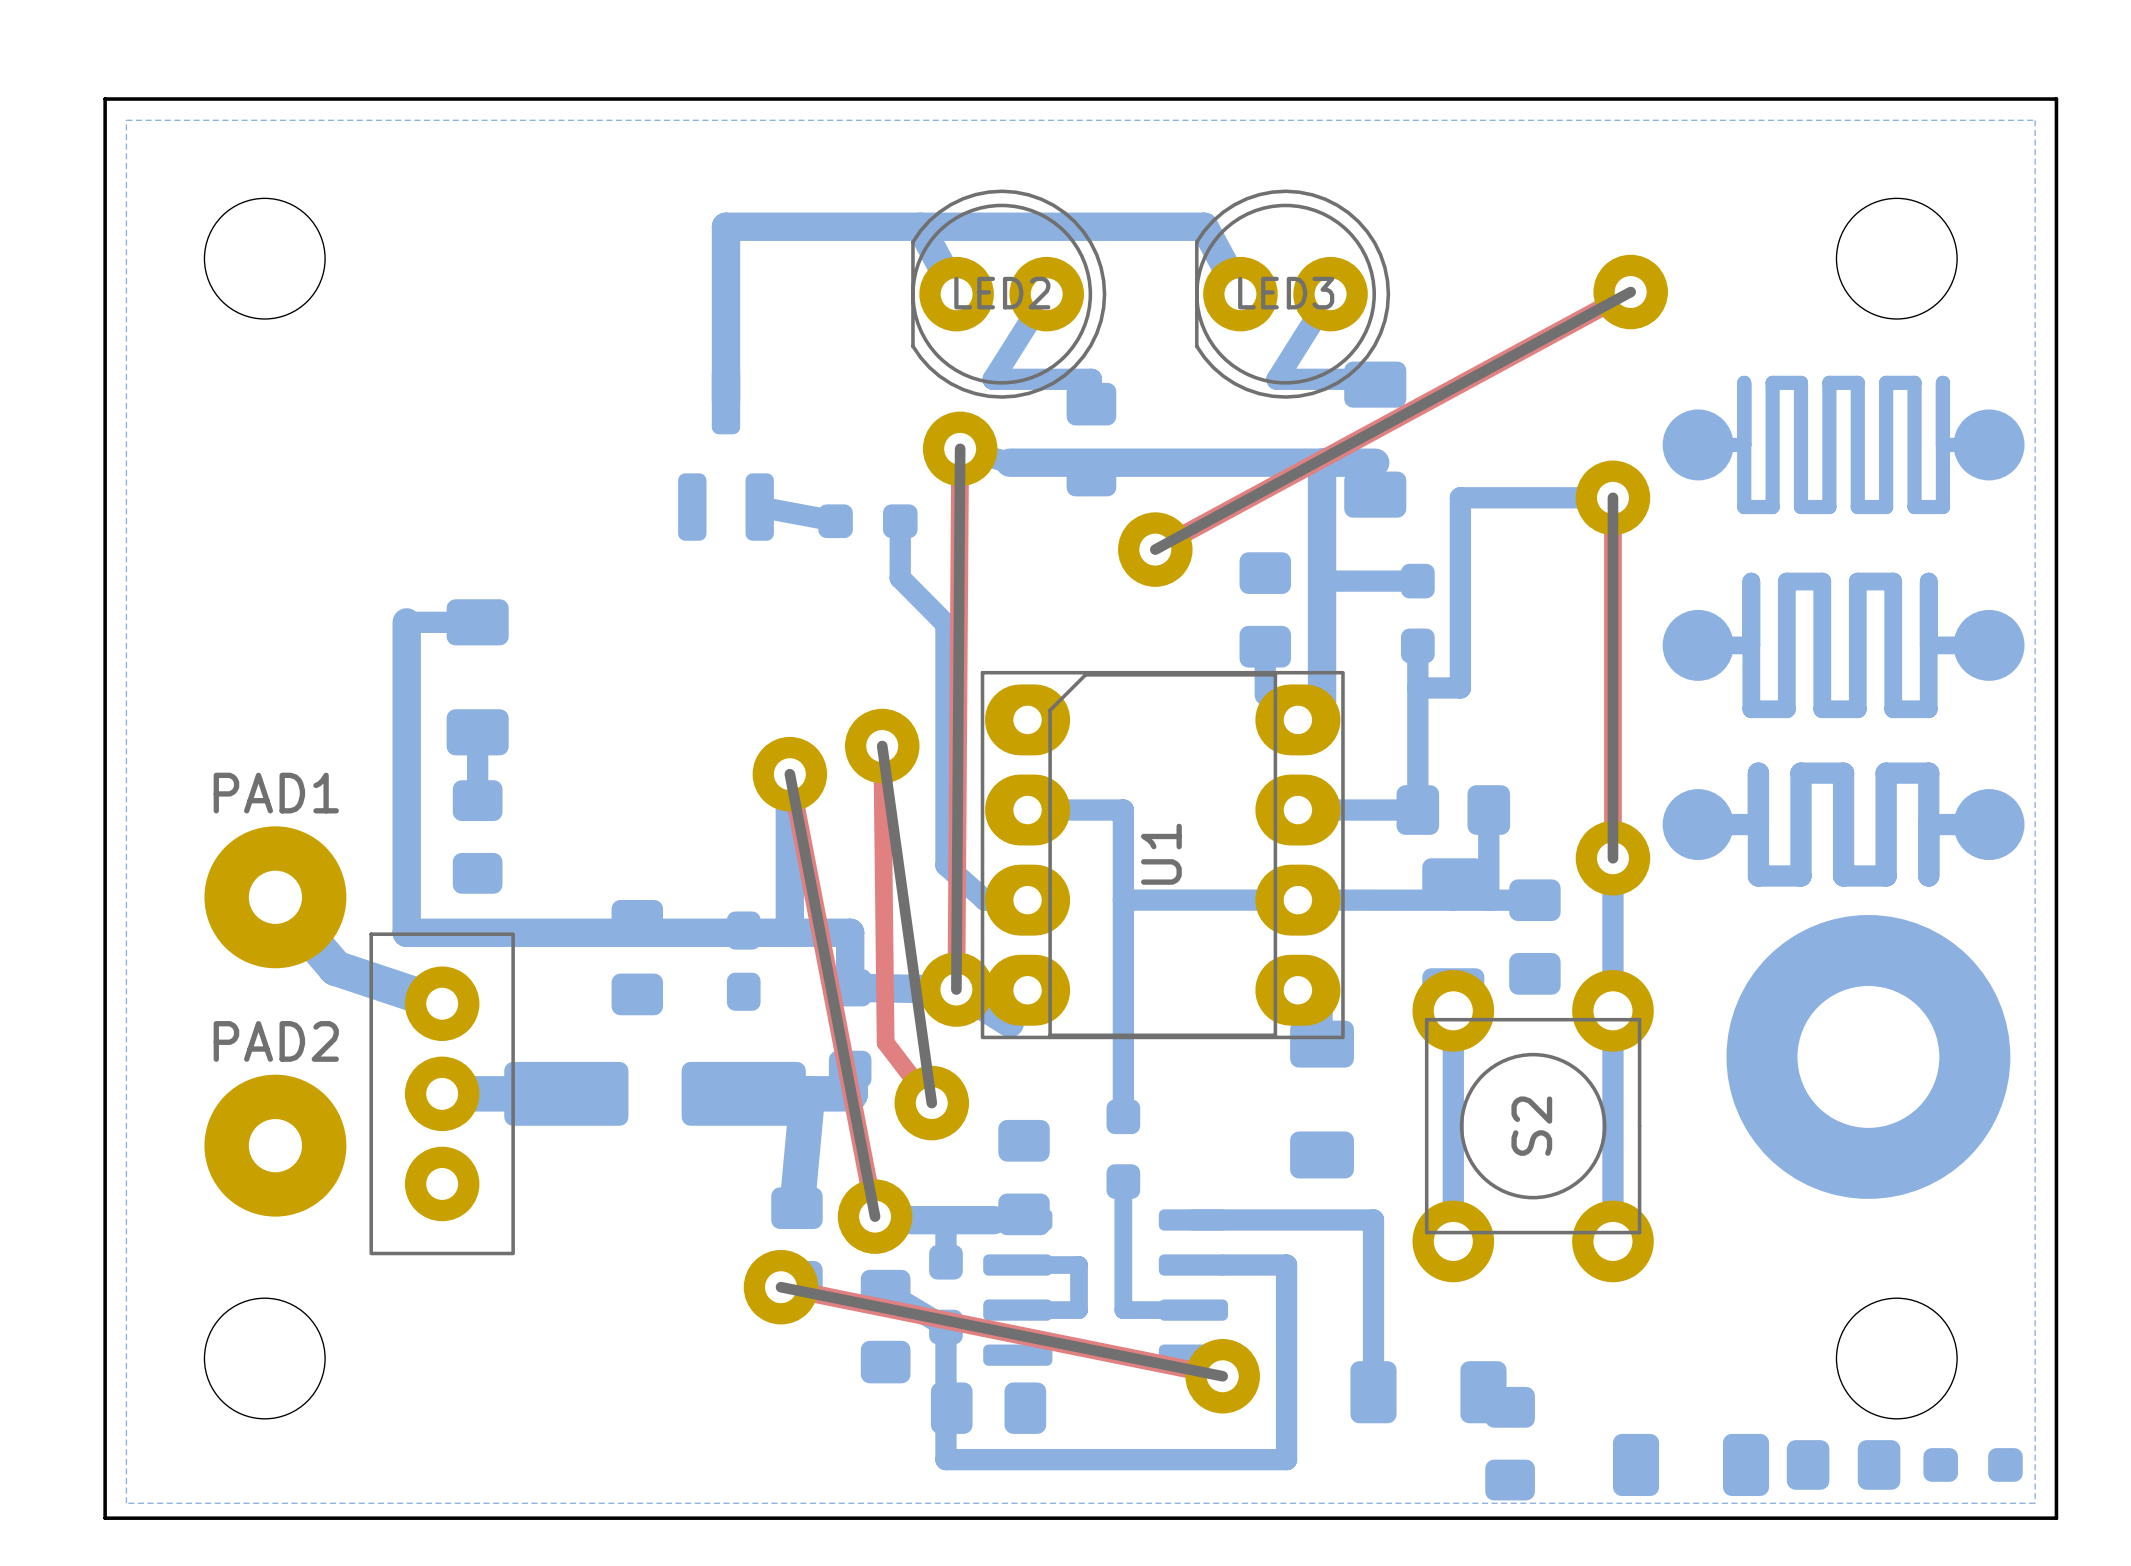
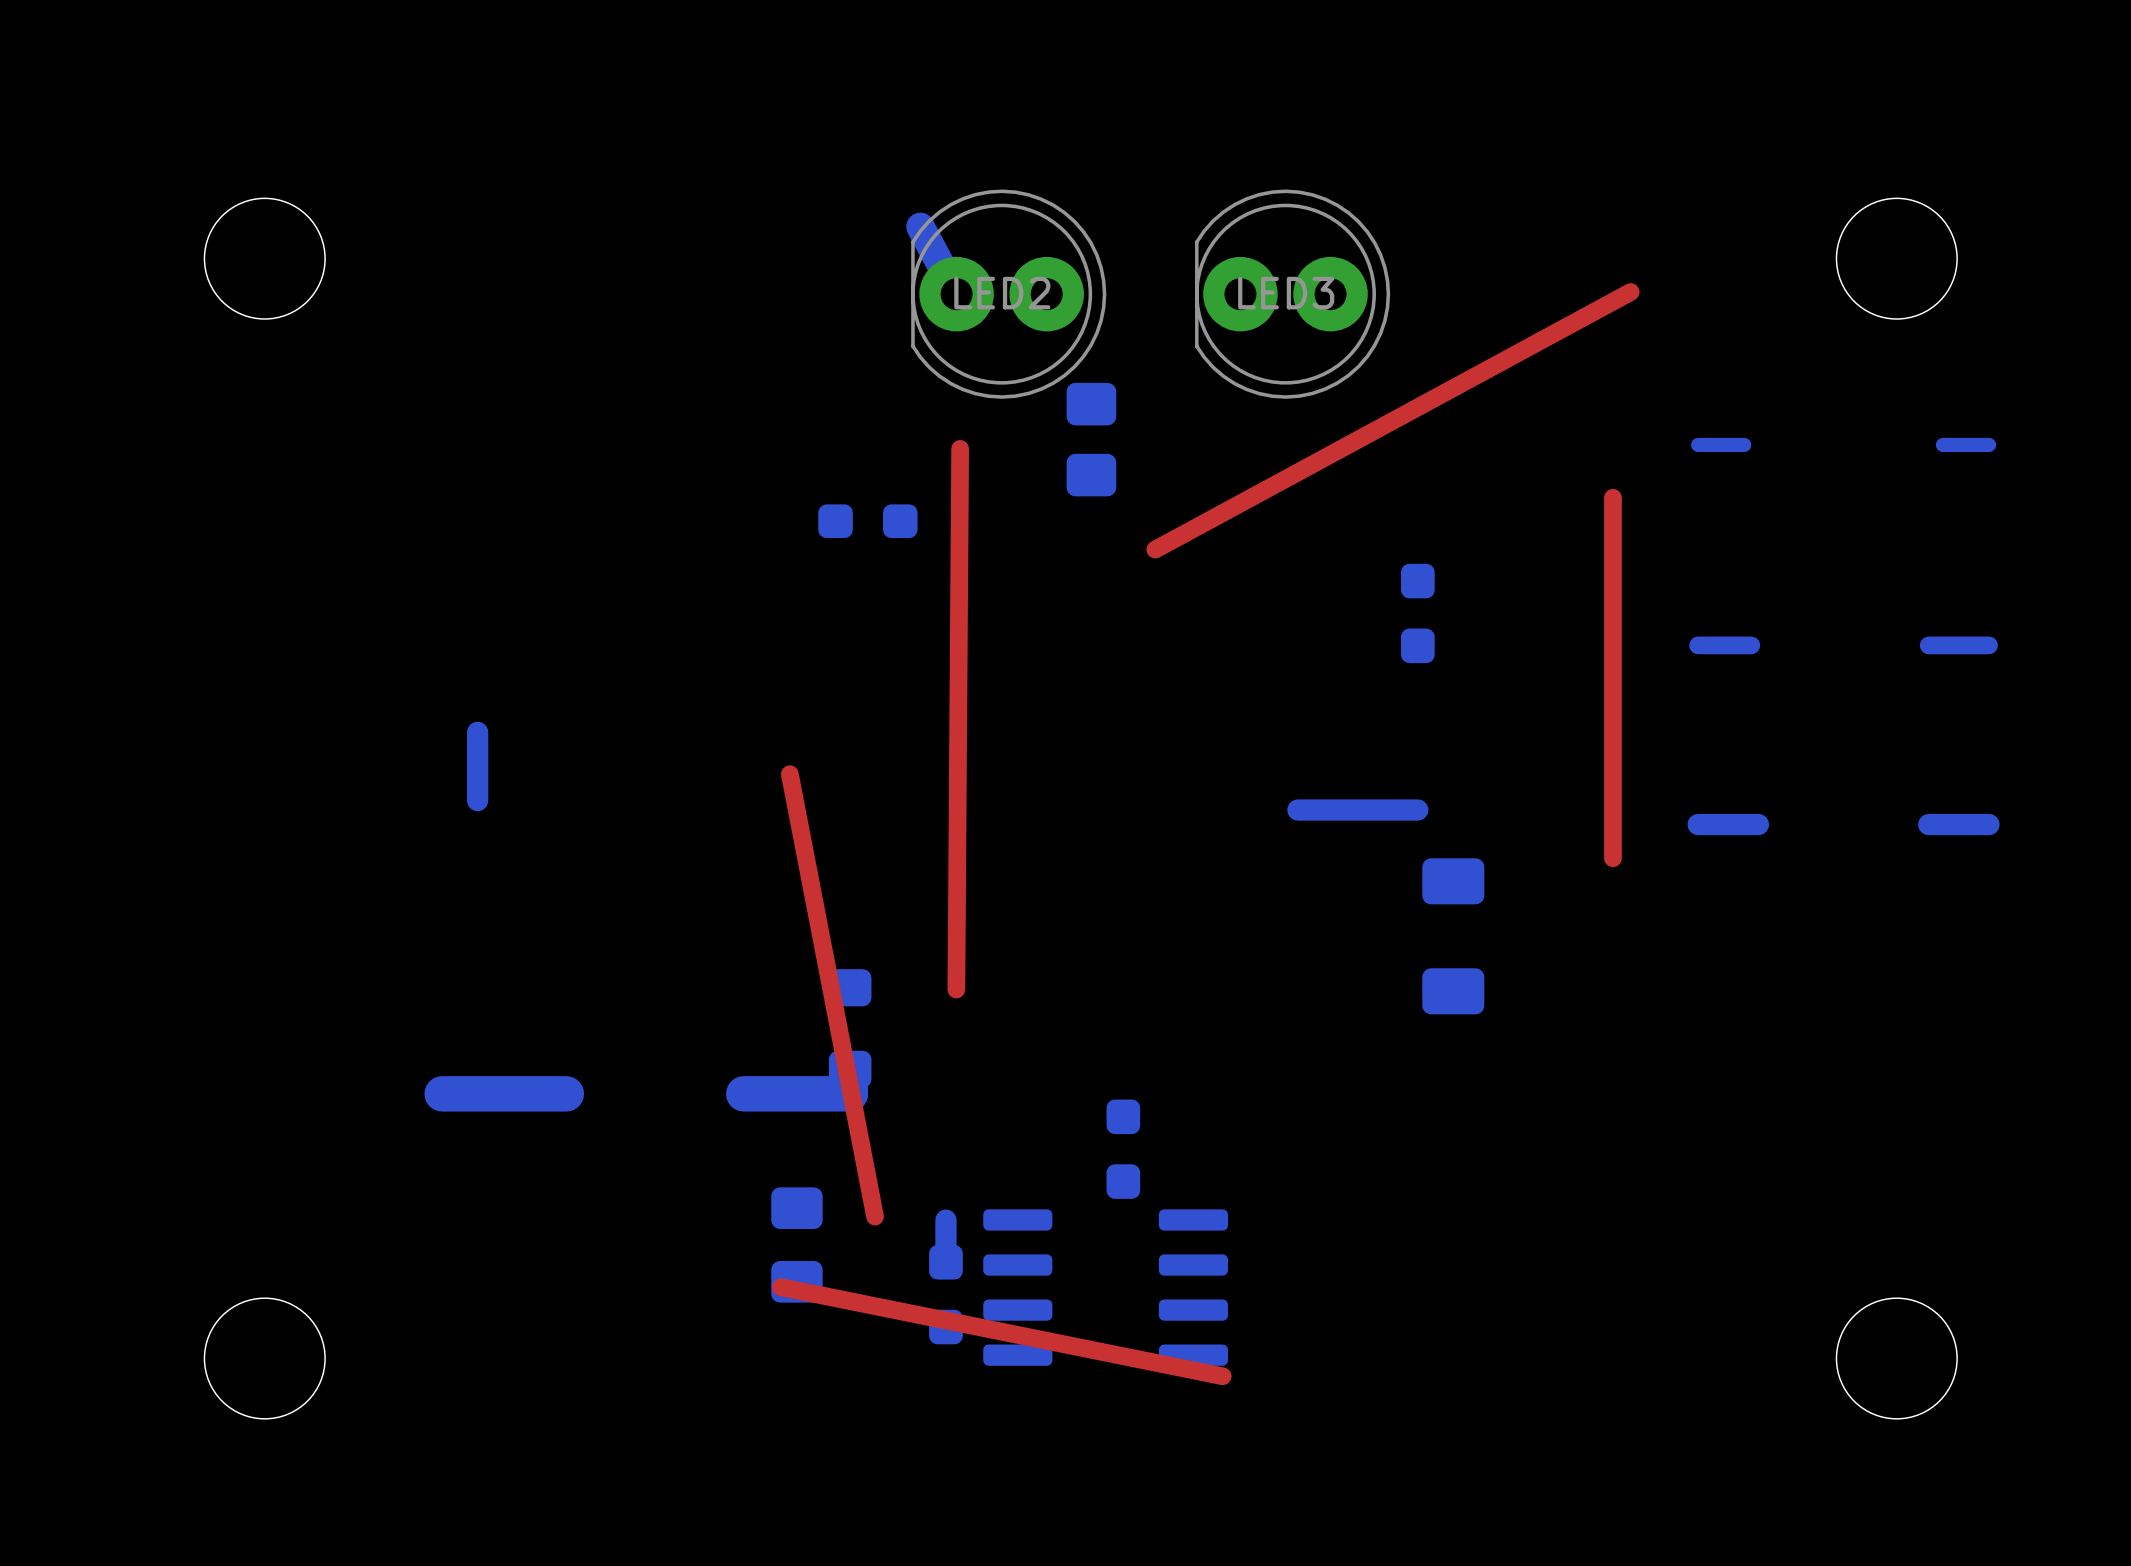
board edge: (105, 99) (2056, 99) (2056, 1518) (105, 1518) (105, 99) -> none
bottom zone outline: (126, 120) (2035, 120) (2035, 1503) (126, 1503) (126, 120) -> none
bottom track: (1046, 294) (993, 379) (1091, 379) (1091, 404) -> none
bottom track: (1240, 294) (1204, 226) (726, 226) (726, 400) -> none
bottom track: (1330, 294) (1276, 379) (1375, 379) (1375, 384) -> none
bottom track: (1744, 382) (1744, 507) (1772, 507) (1772, 382) (1801, 382) (1801, 507) (1829, 507) (1829, 382) (1857, 382) (1857, 507) (1886, 507) (1886, 382) (1914, 382) (1914, 507) (1942, 507) (1942, 382) -> none
part: (1392, 420) -> none
part: (1375, 439) -> none
part: (1698, 444) -> none
part: (1989, 444) -> none
bottom track: (960, 448) (1009, 462) (1375, 462) -> none
part: (726, 453) -> none
bottom track: (1322, 462) (1322, 702) -> none
bottom track: (1612, 497) (1460, 497) (1460, 687) (1417, 687) -> none
bottom track: (759, 507) (835, 521) -> none
bottom track: (900, 521) (900, 577) (945, 624) (945, 865) (984, 900) (1027, 900) -> none
bottom track: (1322, 581) (1417, 581) -> none
bottom track: (1751, 581) (1751, 709) (1786, 709) (1786, 581) (1822, 581) (1822, 709) (1857, 709) (1857, 581) (1893, 581) (1893, 709) (1928, 709) (1928, 581) -> none
part: (1265, 609) -> none
bottom track: (477, 622) (406, 622) (406, 932) (850, 932) (850, 987) (956, 989) (1009, 1023) -> none
bottom track: (1417, 645) (1417, 790) -> none
part: (1698, 645) -> none
part: (1989, 645) -> none
bottom track: (1265, 646) (1265, 695) -> none
part: (477, 677) -> none
part: (1612, 678) -> none
part: (958, 719) -> none
top track: (882, 746) (885, 1042) (931, 1103) -> none
bottom track: (1758, 773) (1758, 876) (1801, 876) (1801, 773) (1843, 773) (1843, 876) (1886, 876) (1886, 773) (1928, 773) (1928, 876) -> none
bottom track: (789, 774) (789, 932) -> none
bottom track: (1027, 810) (1123, 810) (1123, 1116) -> none
part: (1453, 810) -> none
bottom track: (1488, 810) (1488, 900) -> none
part: (1698, 824) -> none
part: (1989, 824) -> none
part: (477, 836) -> none
U1: (1162, 855) -> none
bottom track: (1612, 858) (1612, 971) -> none
bottom track: (275, 897) (335, 968) (442, 1003) -> none
PAD1: (275, 897) -> none
bottom track: (1123, 900) (1261, 900) -> none
bottom track: (1297, 900) (1534, 900) -> none
drawing: [1726, 915, 2011, 1199] -> none
part: (907, 924) -> none
part: (1534, 937) -> none
part: (637, 957) -> none
part: (743, 961) -> none
part: (832, 995) -> none
bottom track: (1322, 1007) (1322, 1044) -> none
bottom track: (1453, 1010) (1453, 1241) -> none
bottom track: (1612, 1010) (1612, 1241) -> none
part: (442, 1093) -> none
part: (655, 1093) -> none
bottom track: (807, 1093) (796, 1208) -> none
part: (1322, 1099) -> none
S2: (1533, 1126) -> none
PAD2: (275, 1145) -> none
part: (1024, 1177) -> none
bottom track: (1123, 1181) (1123, 1310) (1160, 1310) -> none
bottom track: (1193, 1219) (1373, 1219) (1373, 1376) -> none
bottom track: (910, 1220) (993, 1220) -> none
bottom track: (1017, 1265) (1079, 1265) (1079, 1310) (1017, 1310) -> none
bottom track: (1222, 1265) (1286, 1265) (1286, 1459) (945, 1459) (945, 1327) (885, 1291) -> none
part: (885, 1326) -> none
part: (1001, 1331) -> none
part: (1428, 1392) -> none
part: (988, 1408) -> none
part: (1510, 1443) -> none
part: (1691, 1464) -> none
part: (1843, 1464) -> none
part: (1973, 1464) -> none

